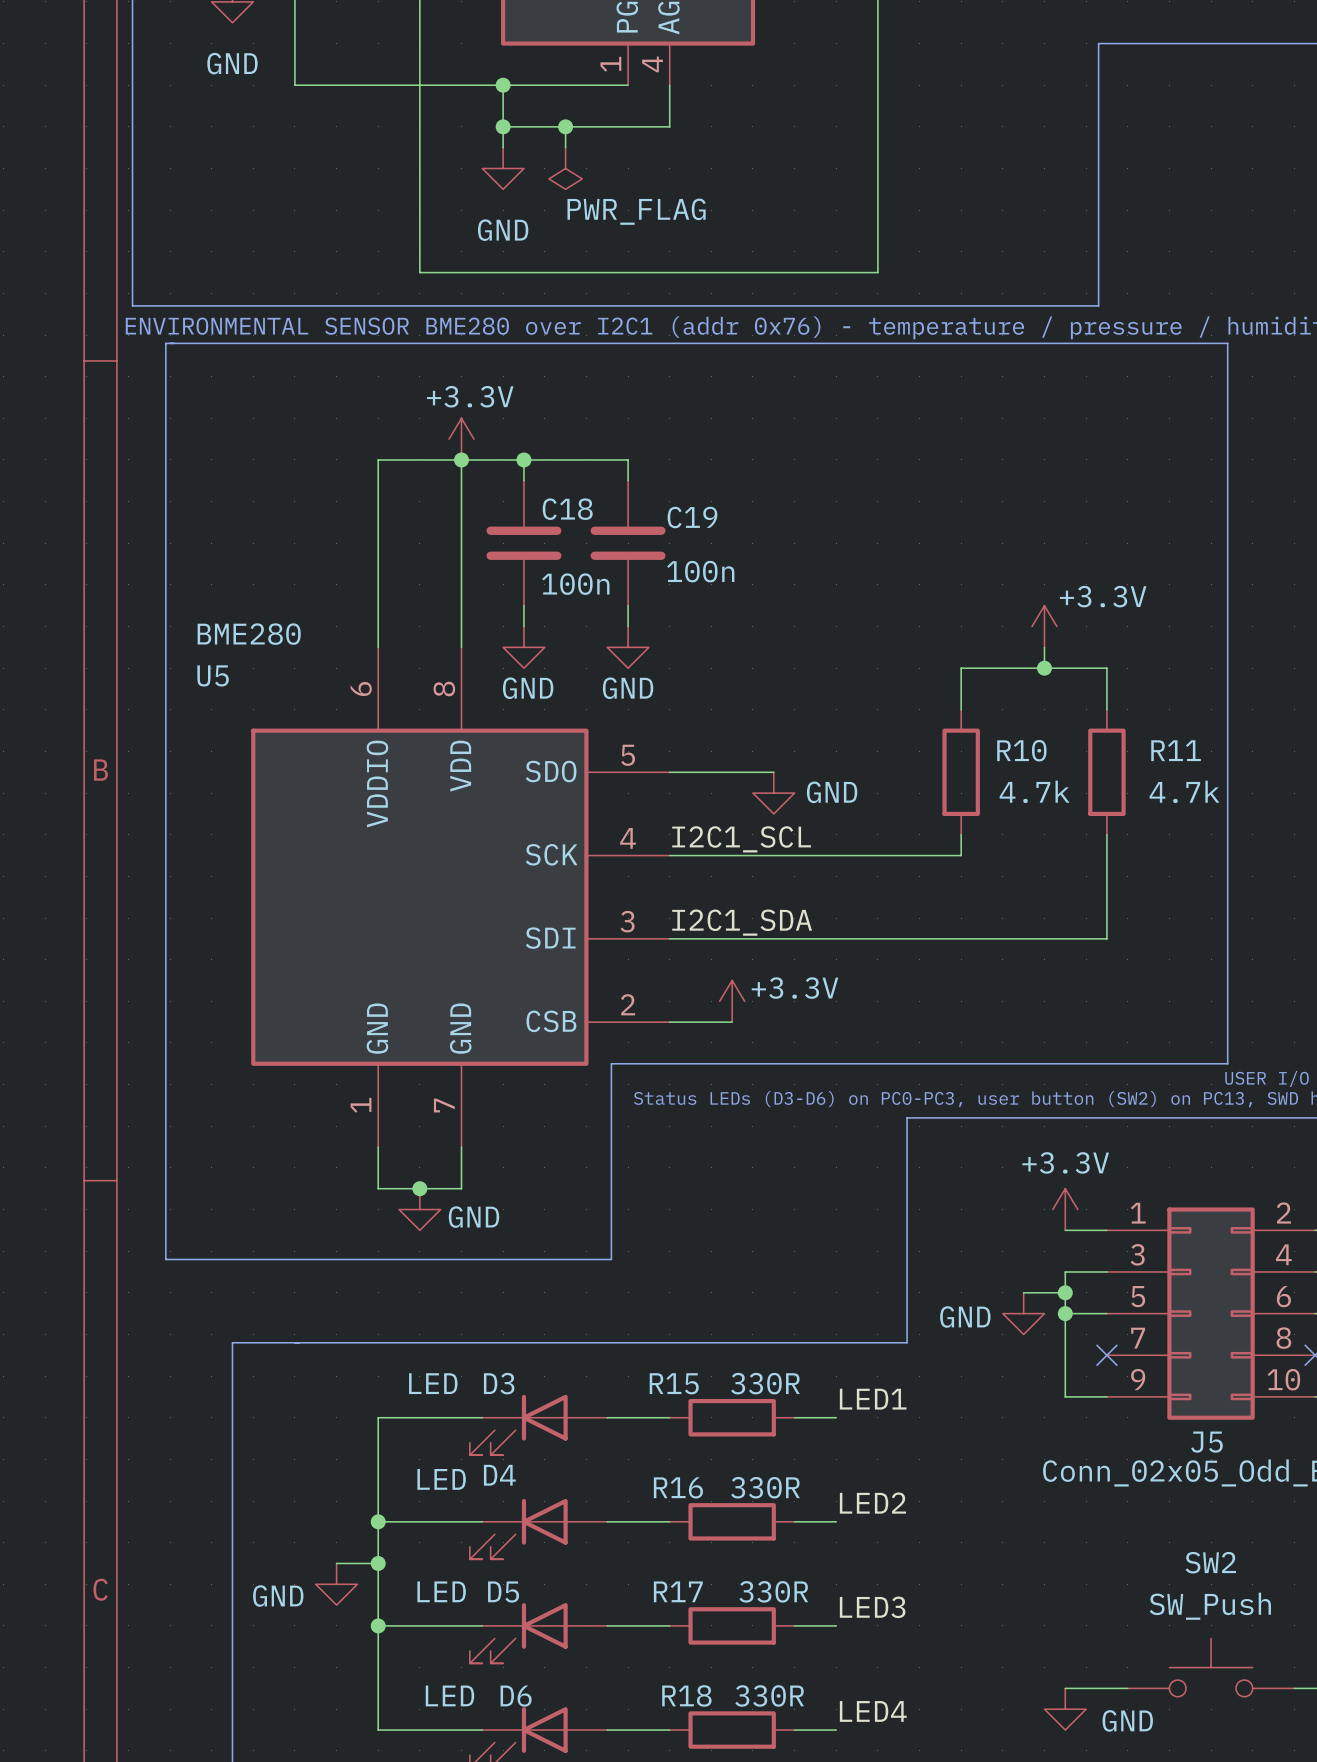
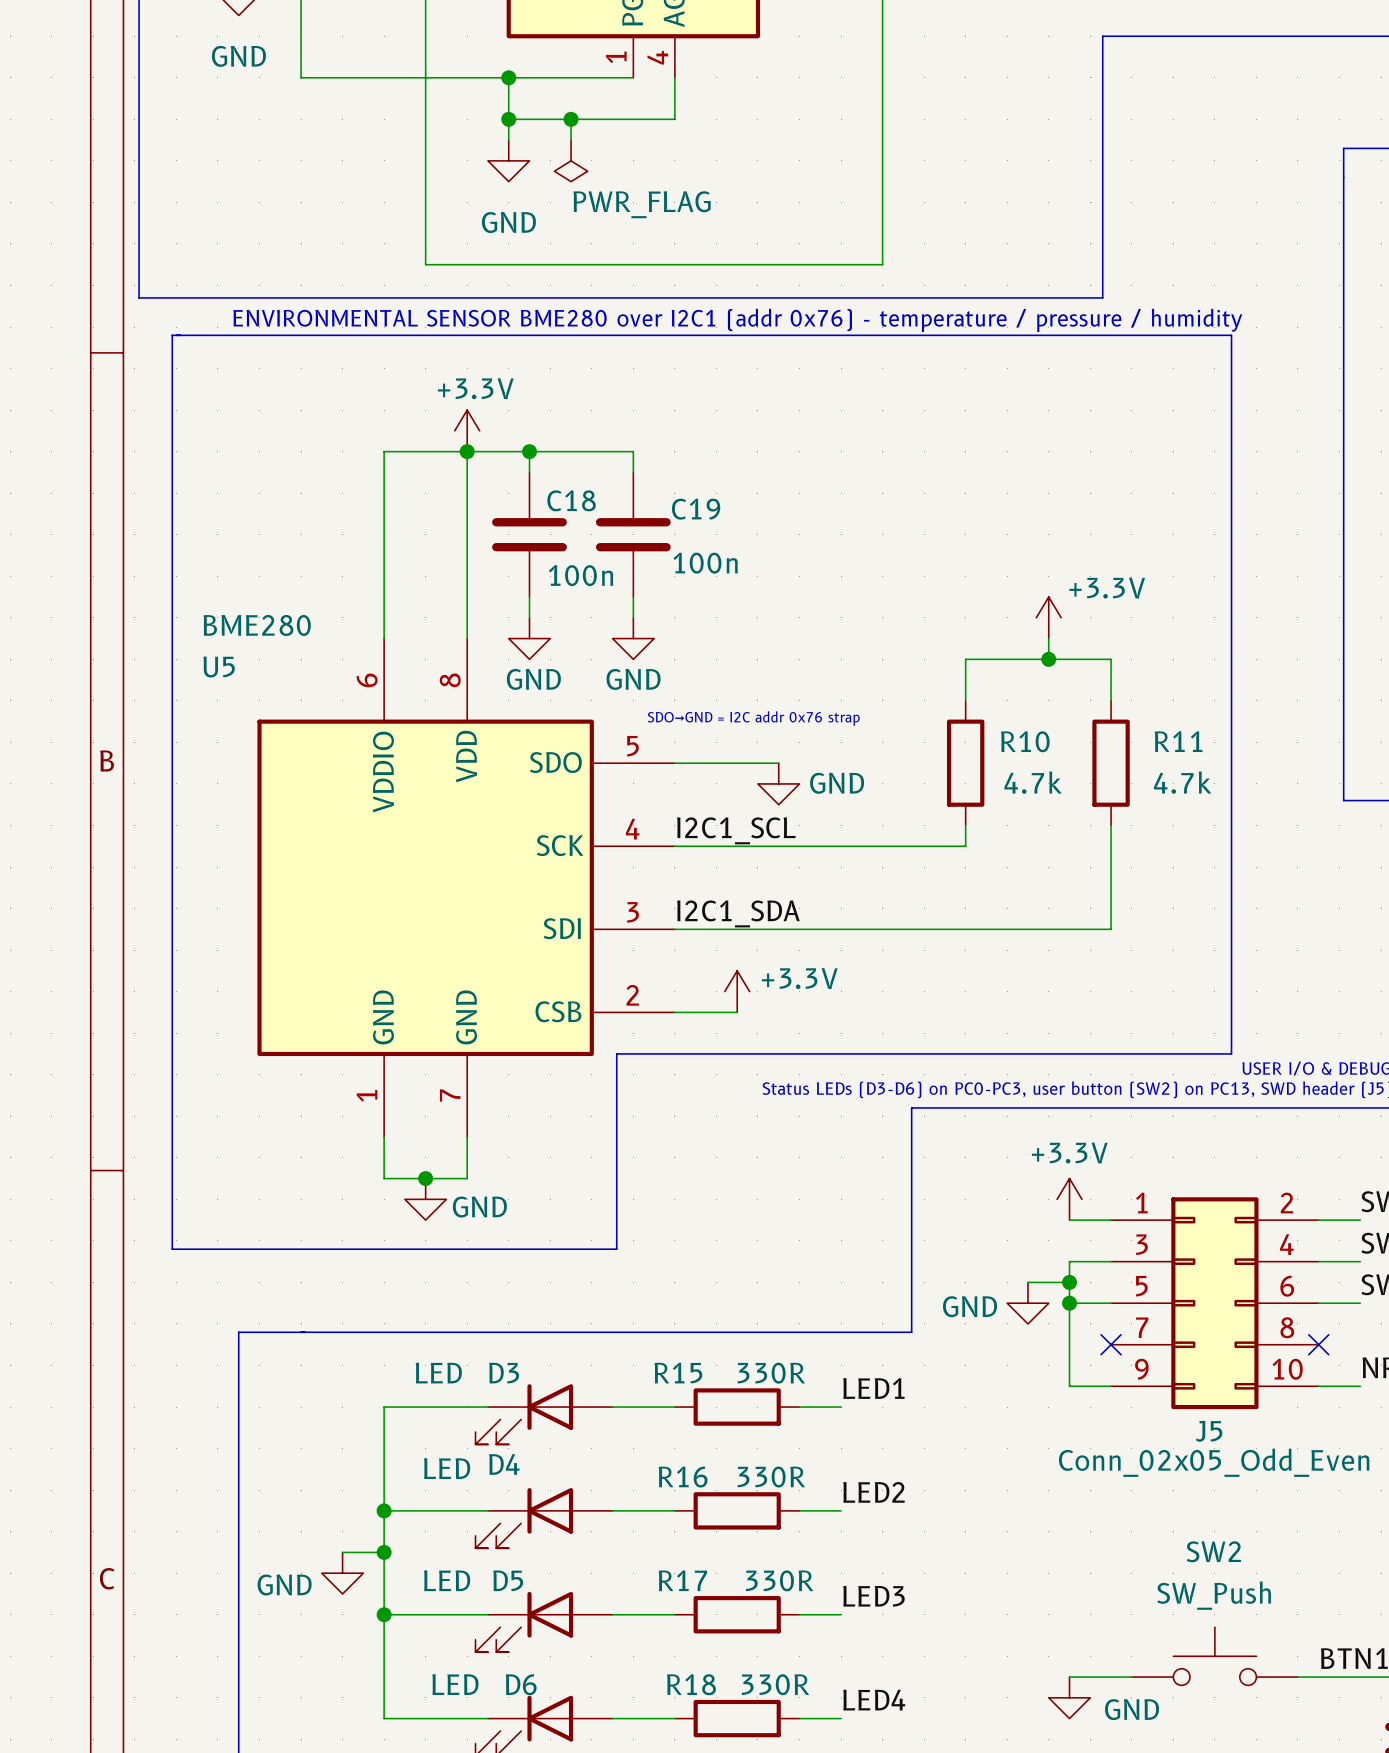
text: none -> SDO→GND = I2C addr 0x76 strap (753, 718)

